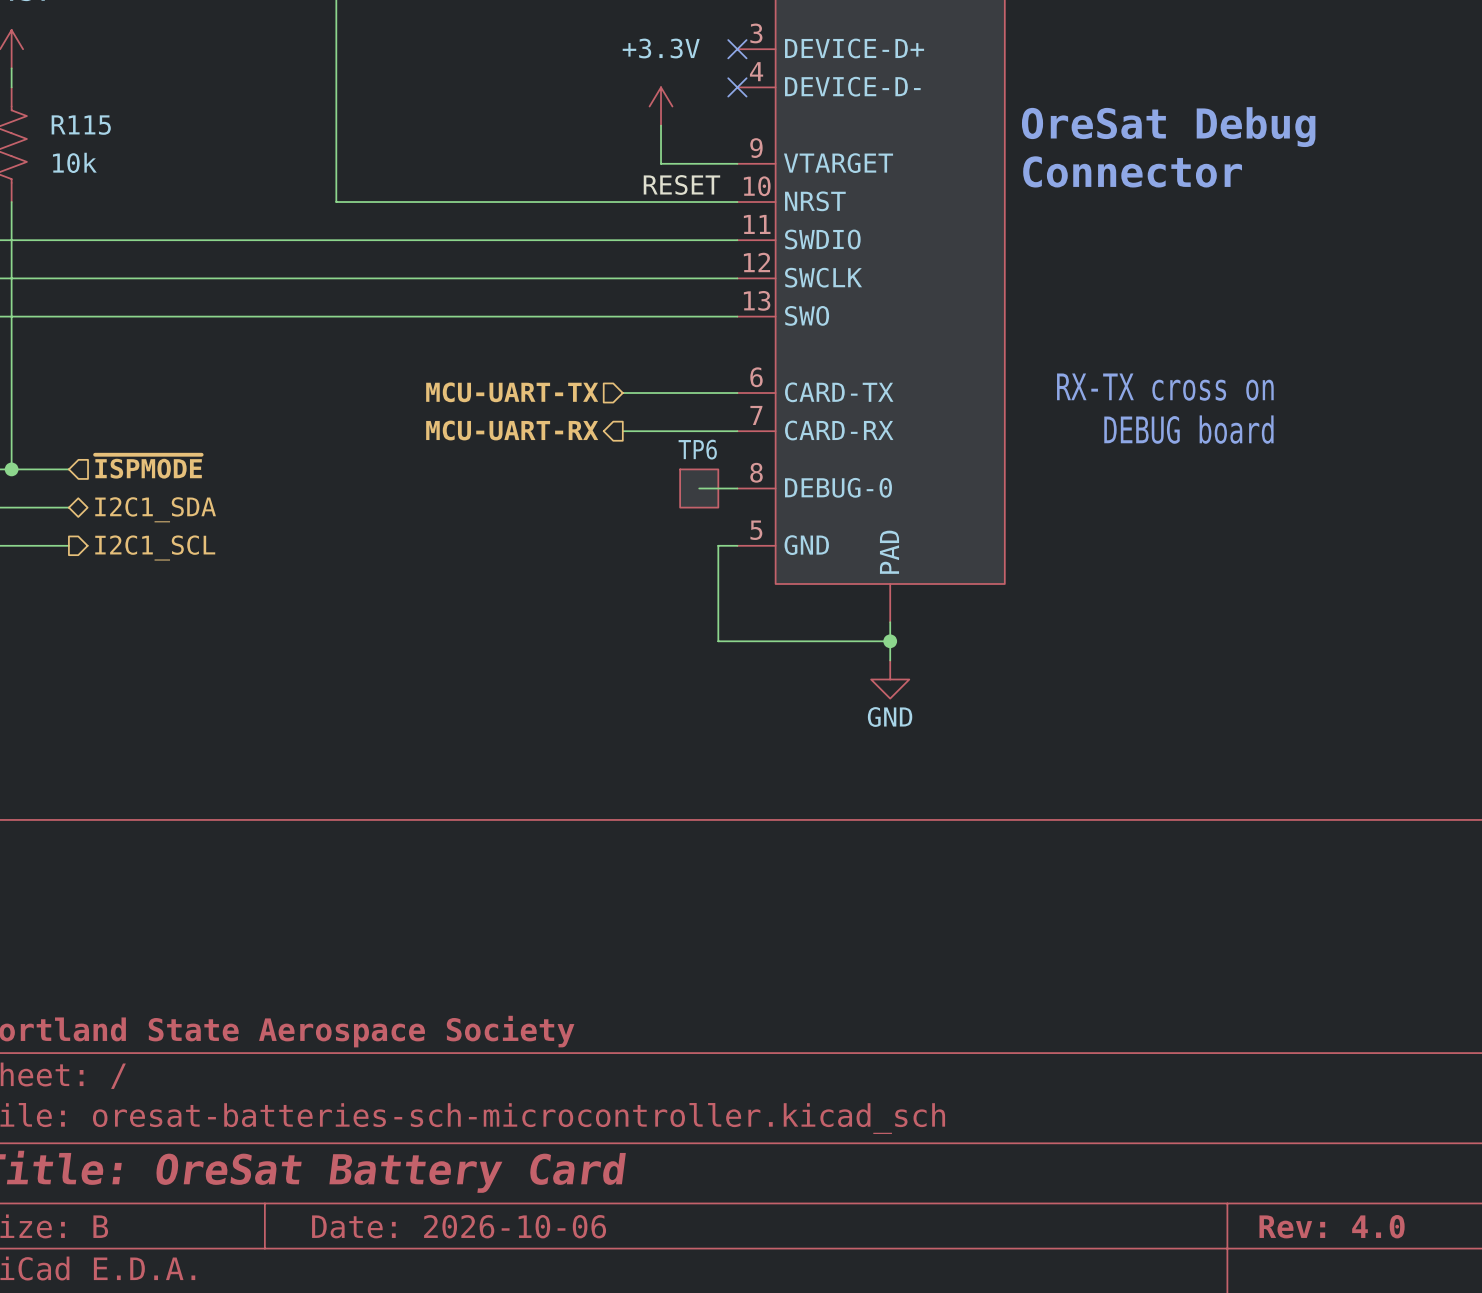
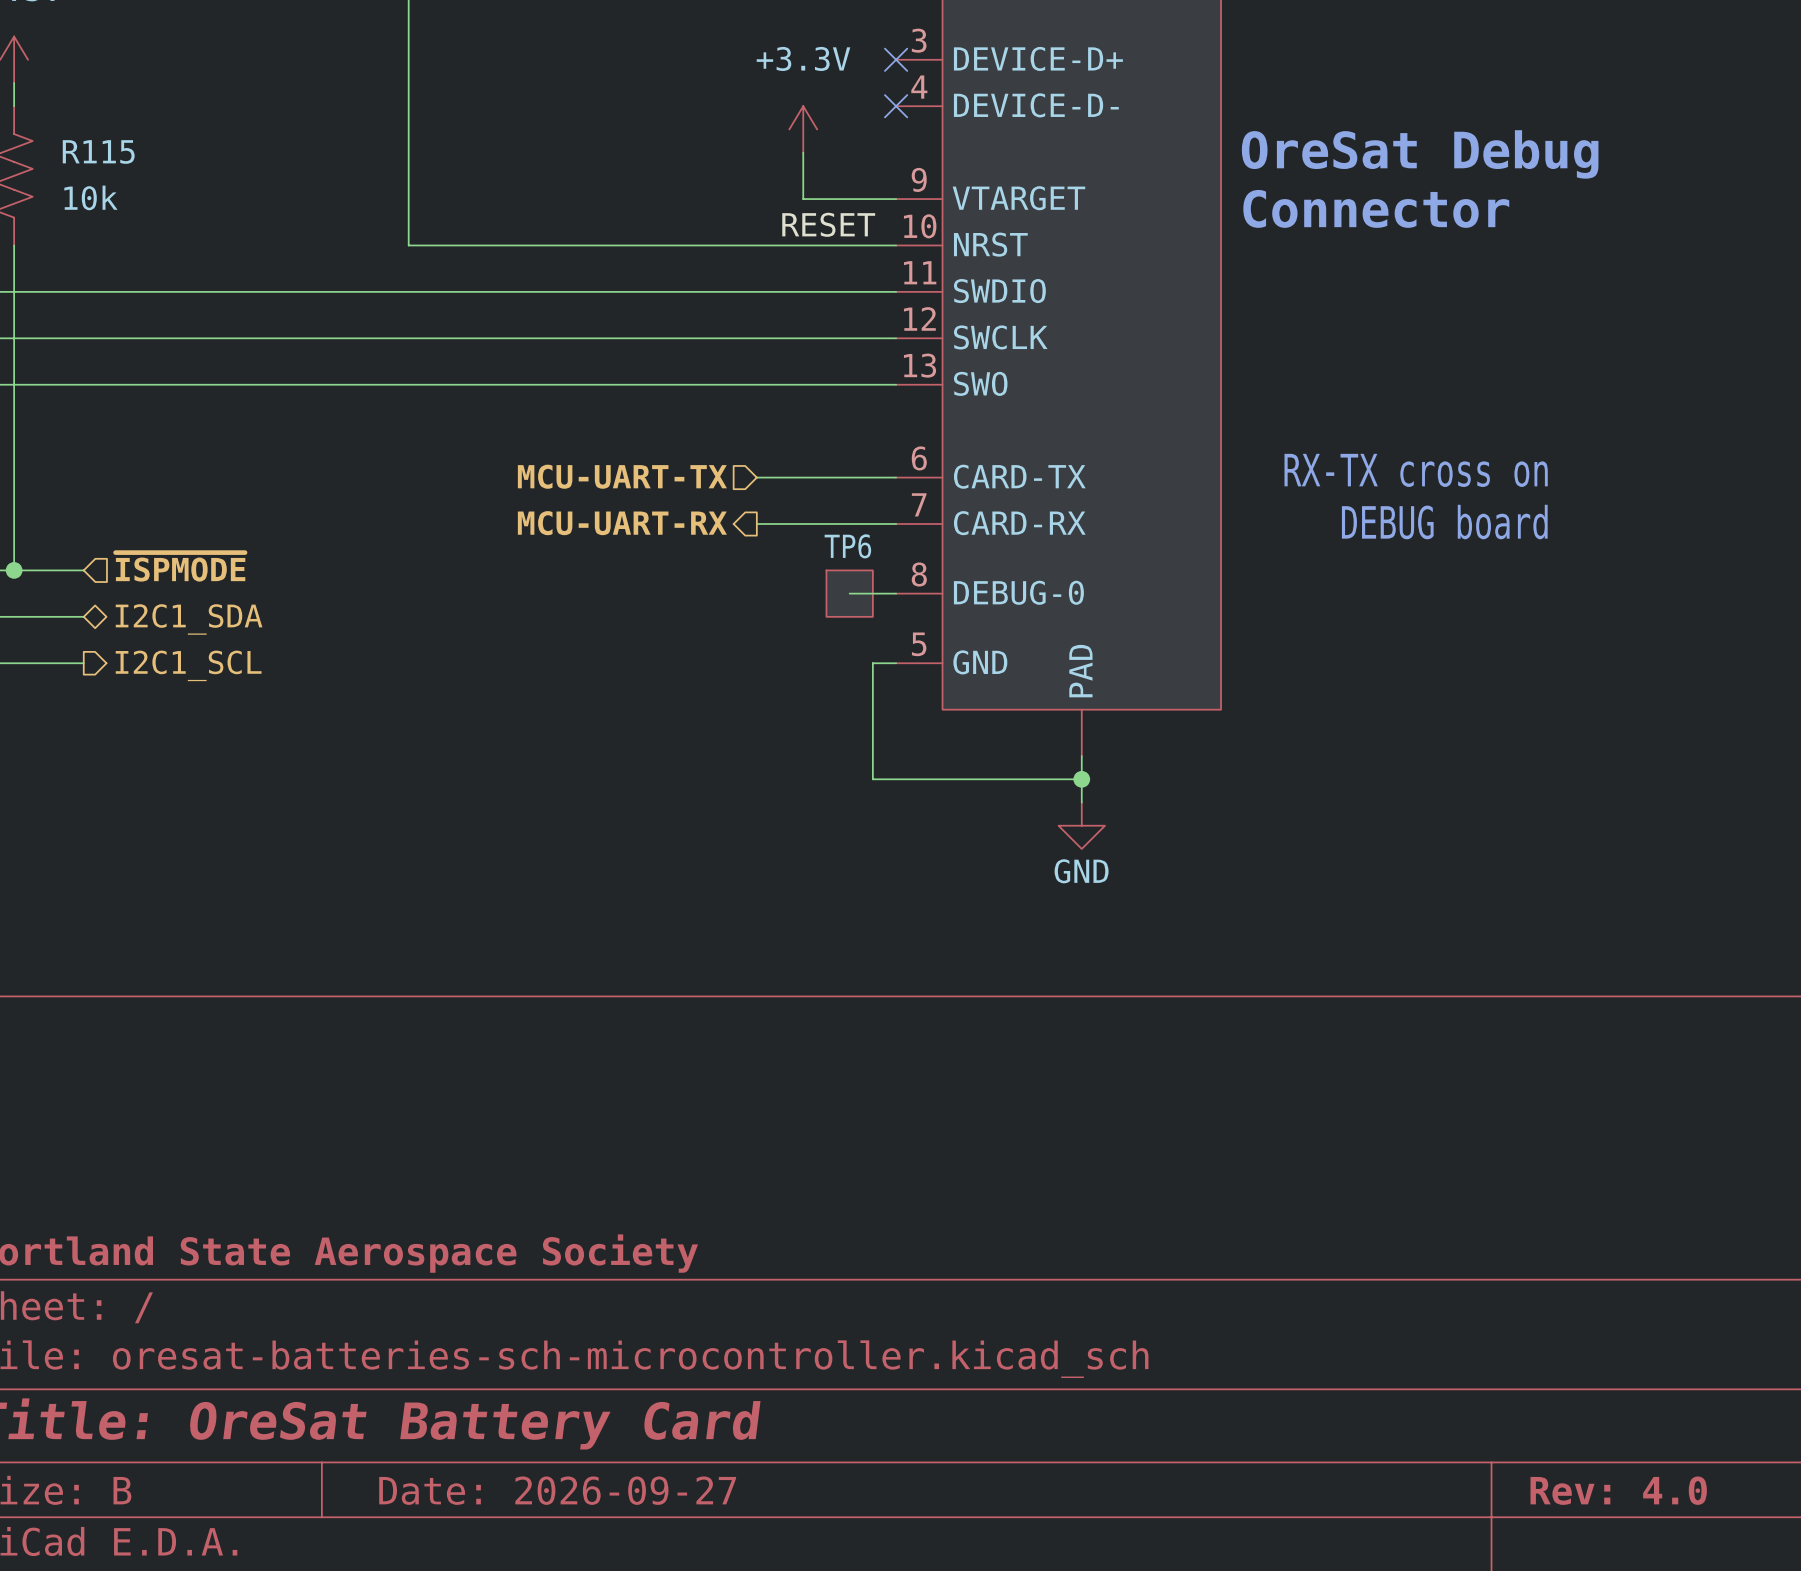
title block: Date: 2026-10-06 (459, 1226) -> Date: 2026-09-27 (557, 1490)

